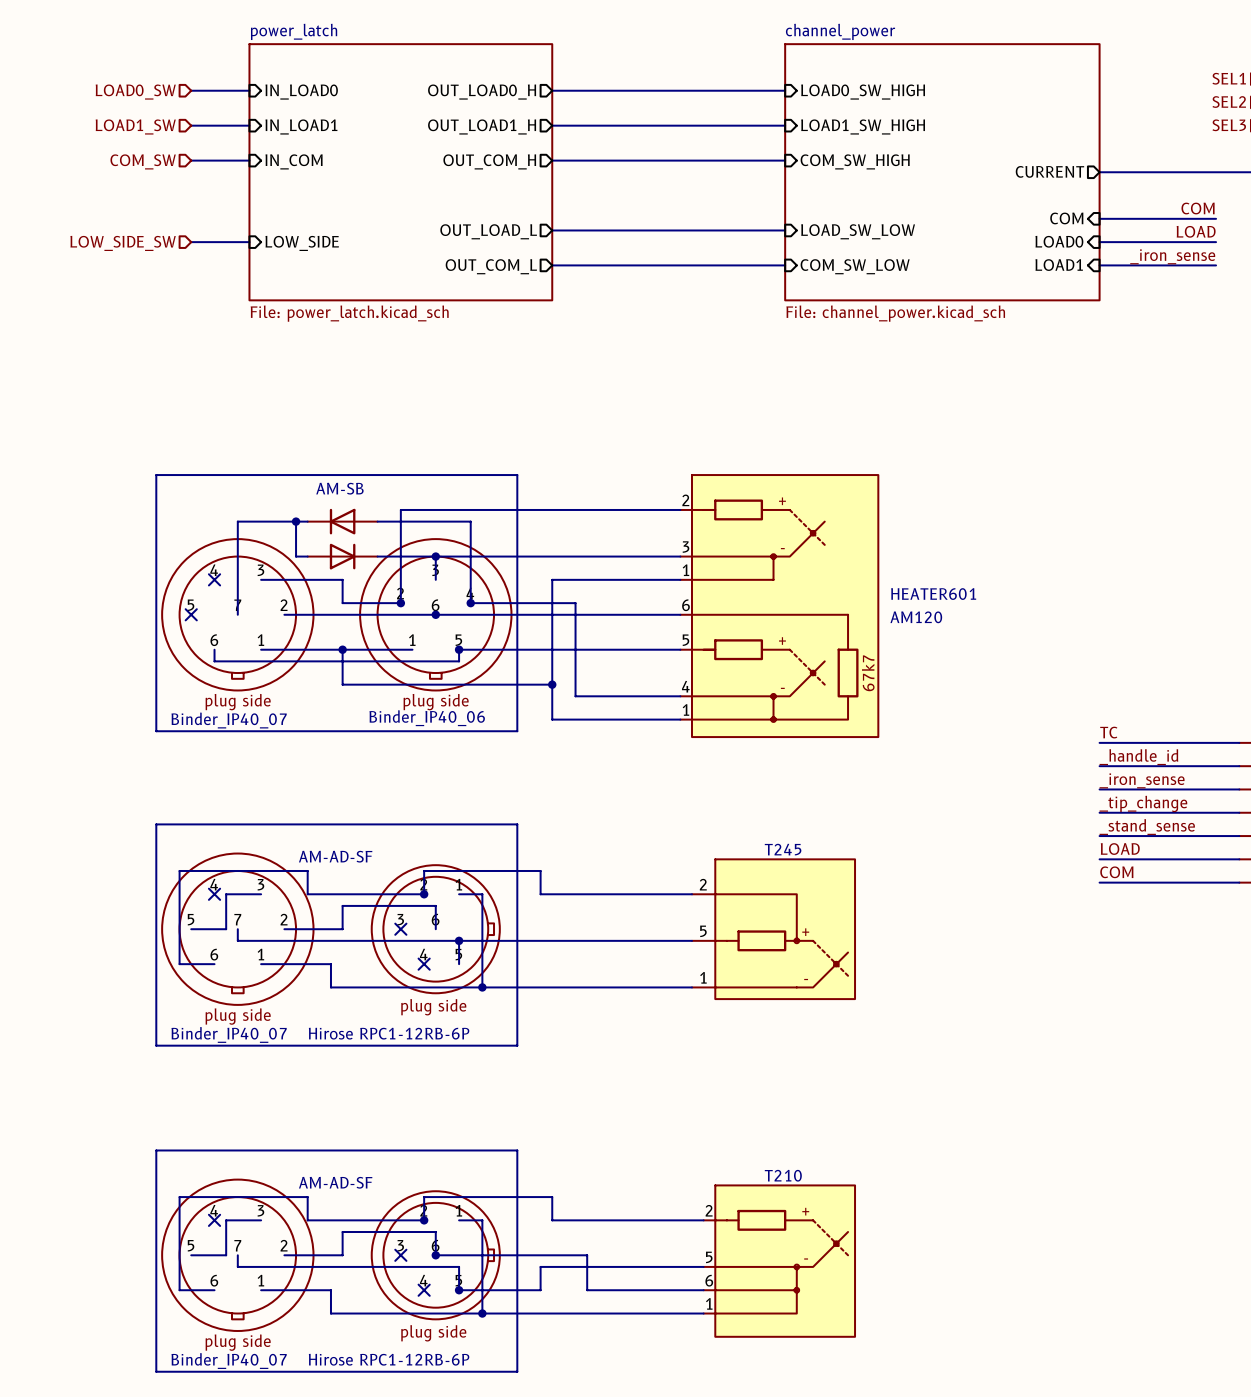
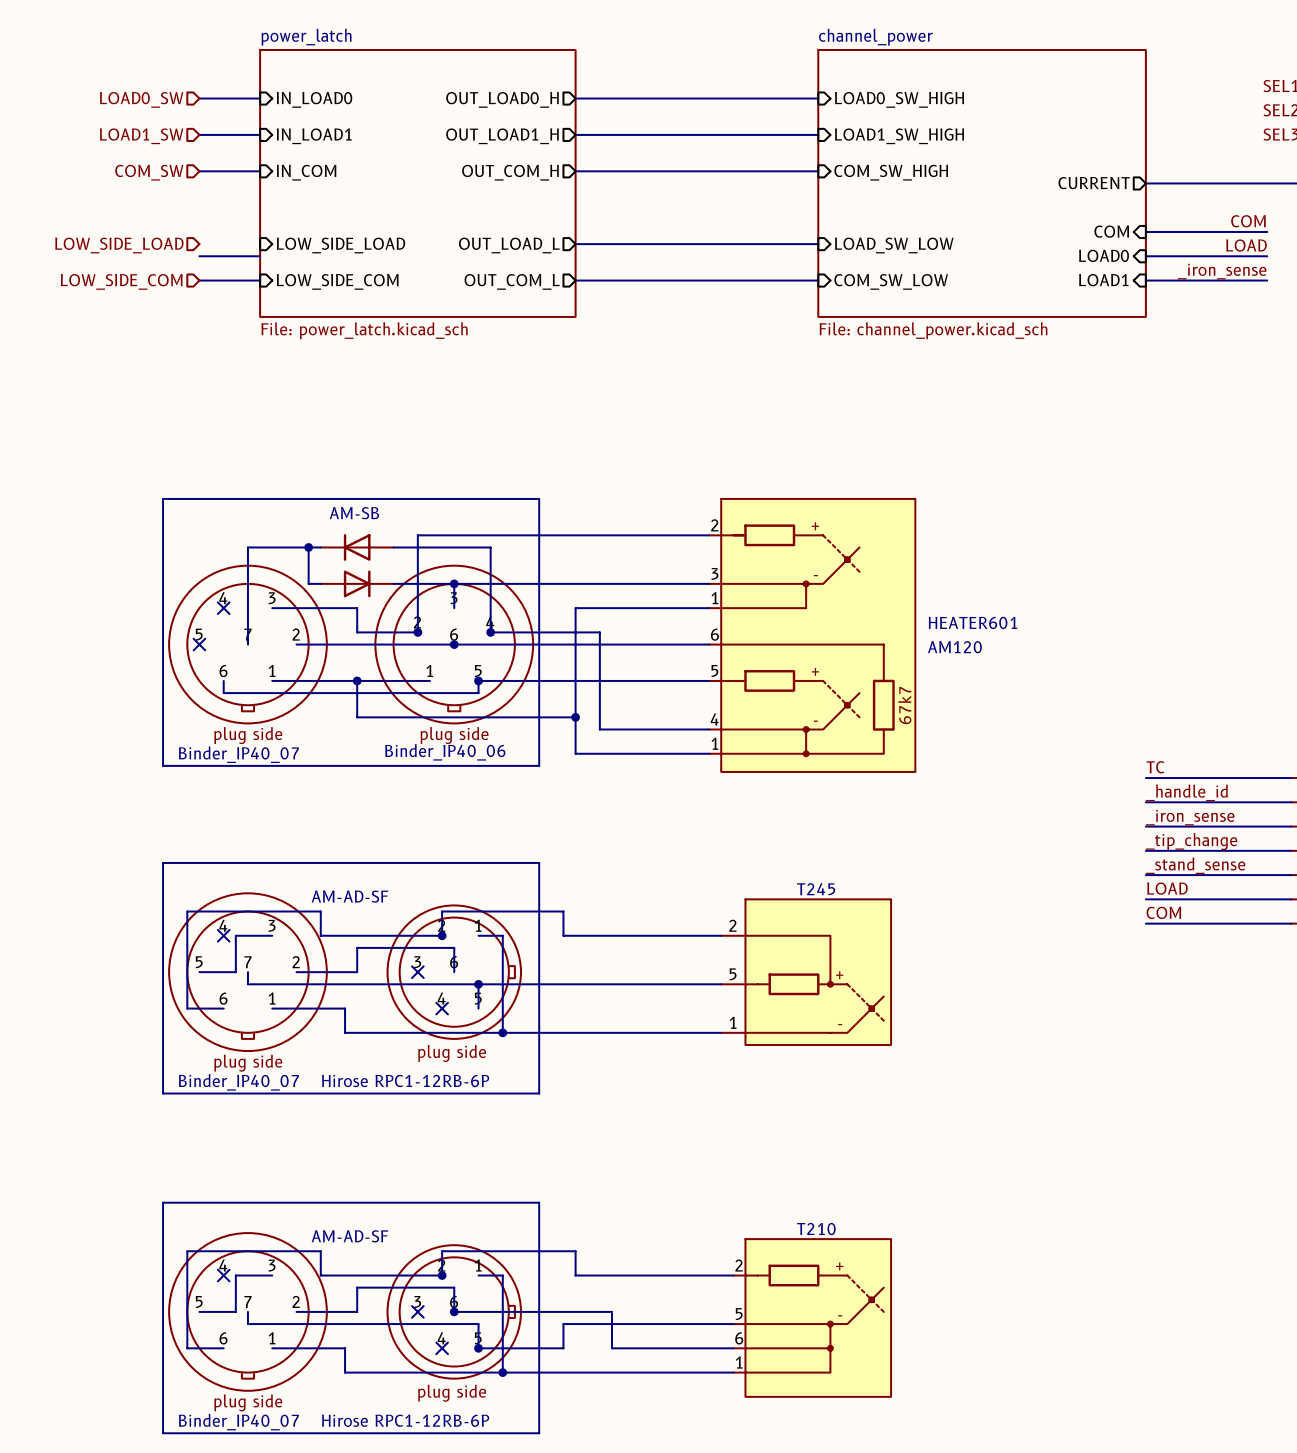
hierarchical label: none -> LOW_SIDE_LOAD (119, 245)
sheet pin: none -> LOW_SIDE_LOAD (340, 245)
hierarchical label: LOW_SIDE_SW (123, 243) -> none
sheet pin: LOW_SIDE (302, 243) -> none
wire: none -> (199, 280) (260, 280)
hierarchical label: none -> LOW_SIDE_COM (121, 281)
sheet pin: none -> LOW_SIDE_COM (337, 281)

